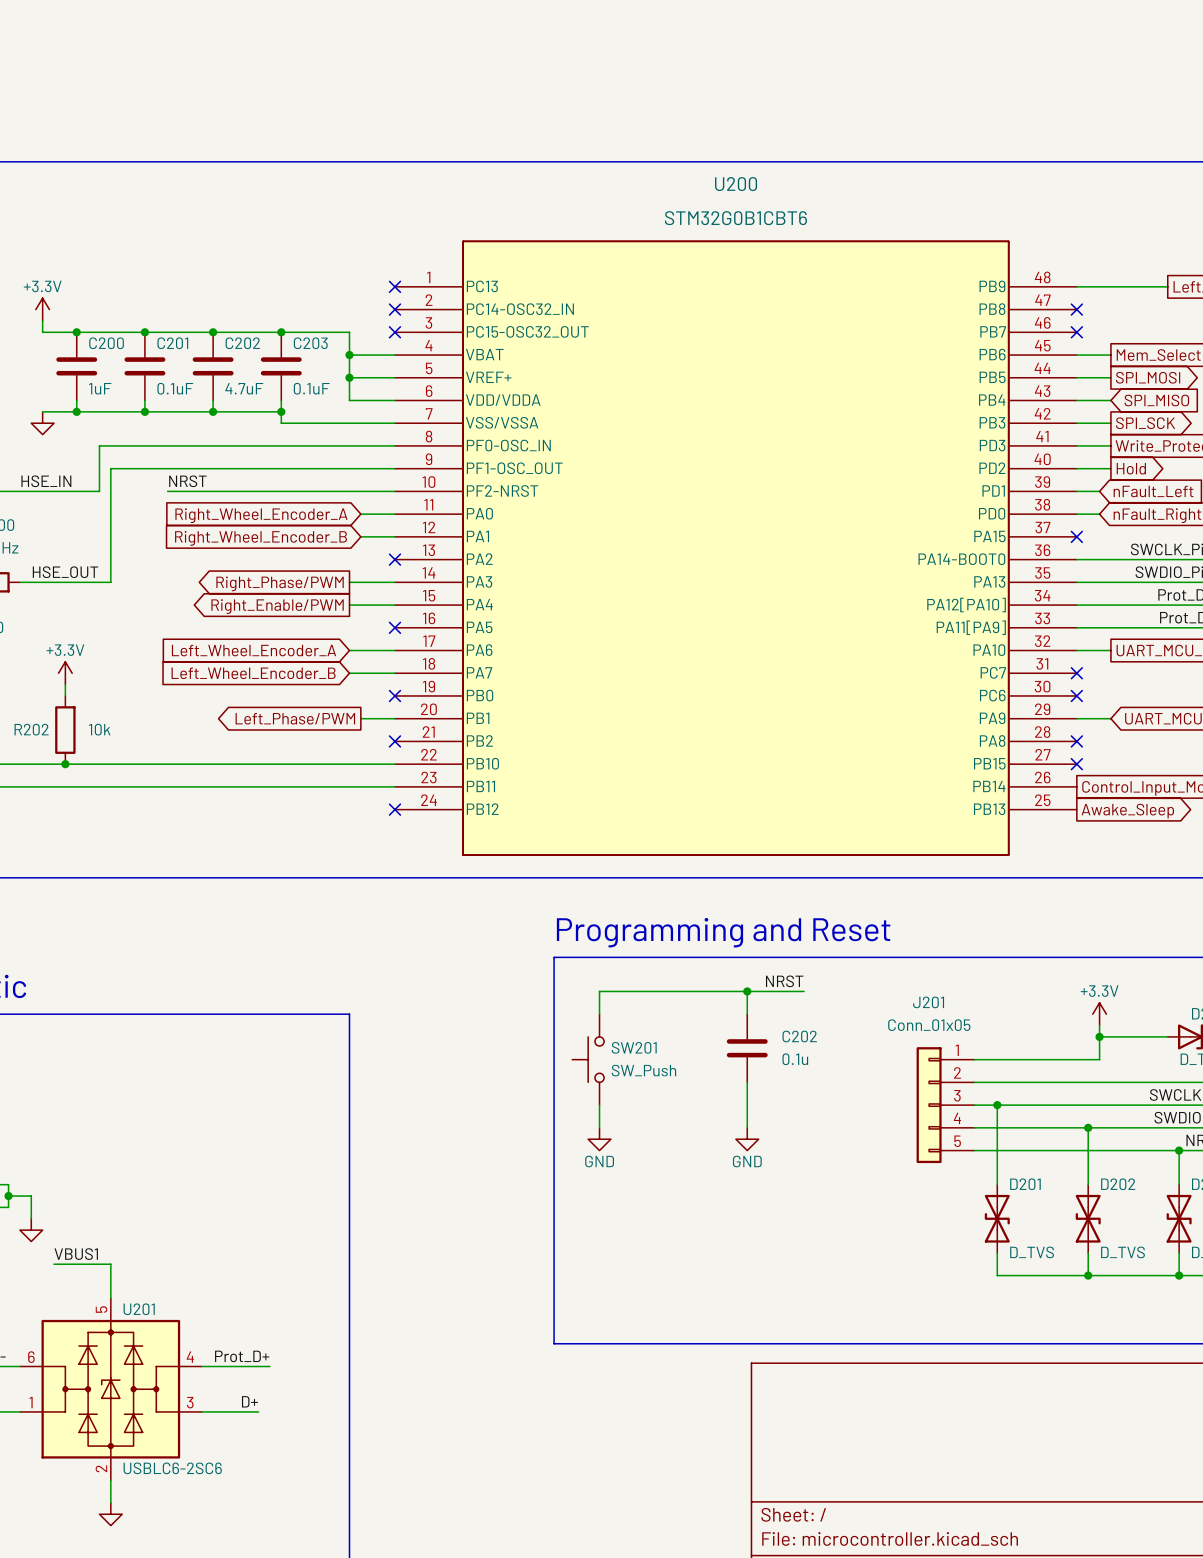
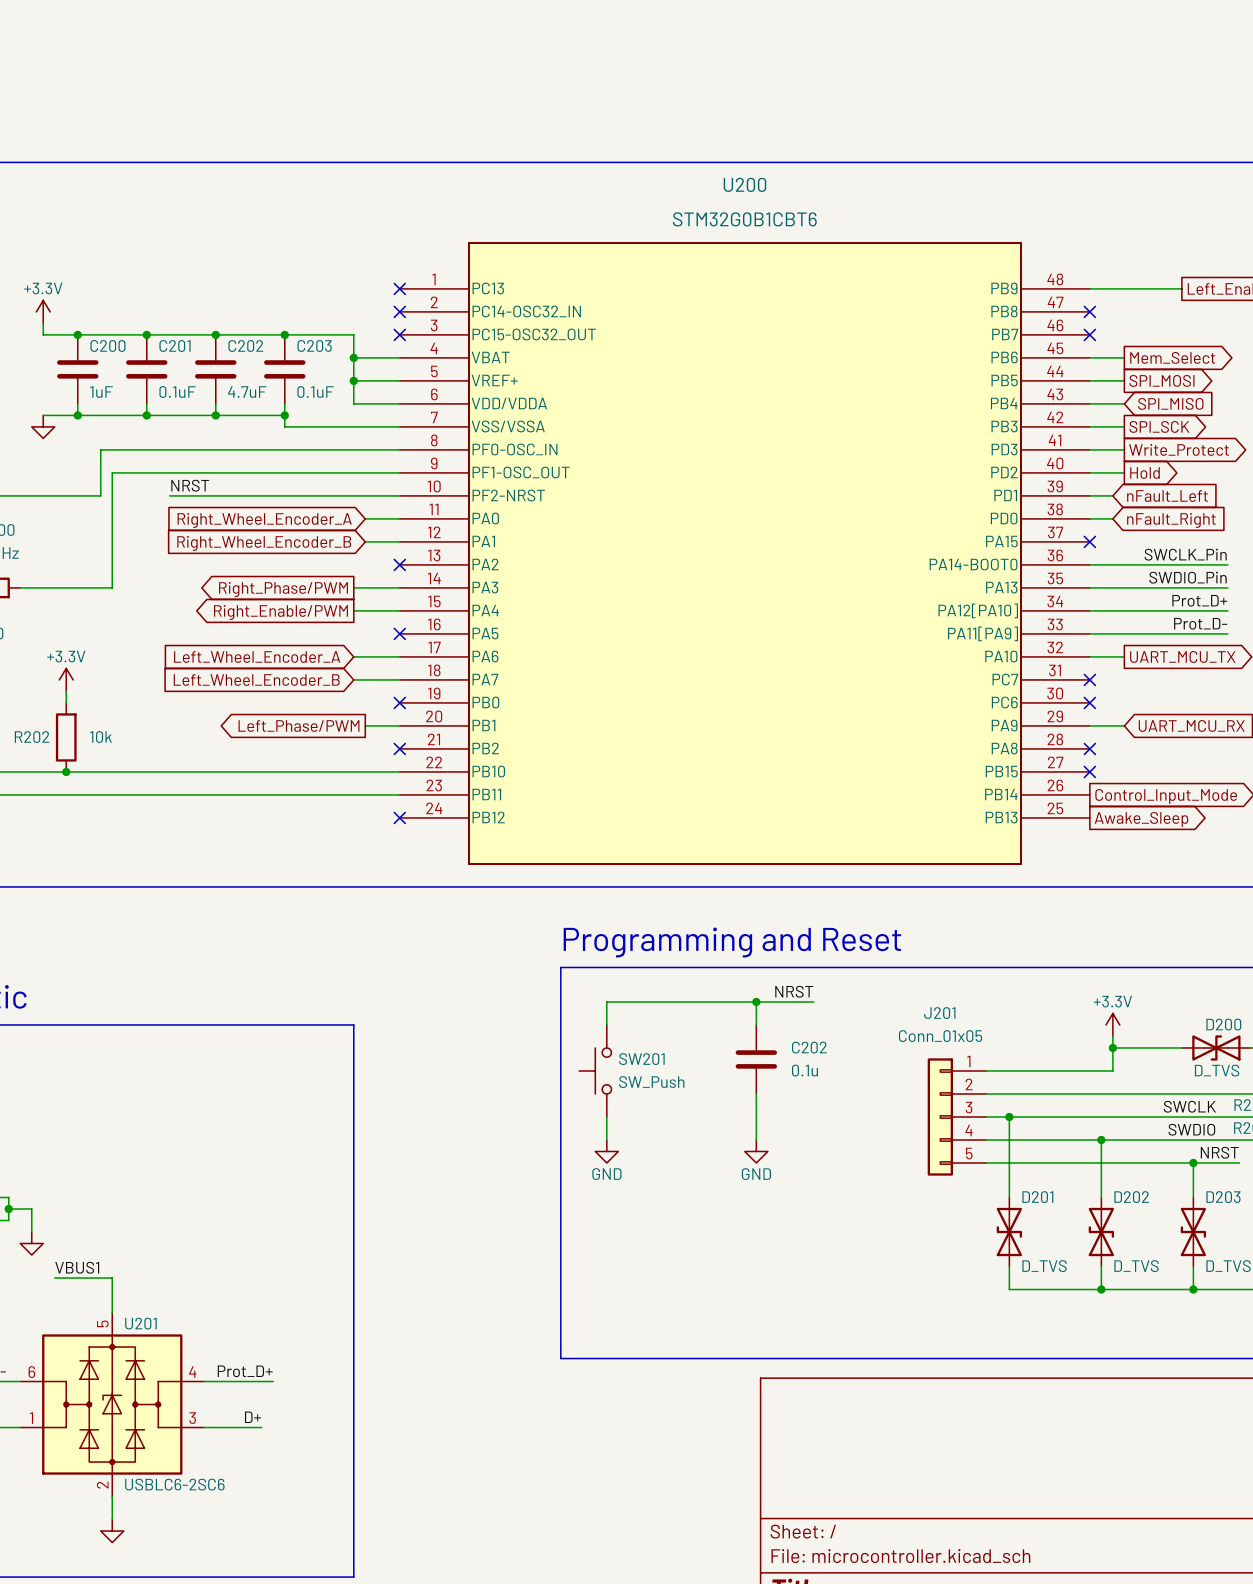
label: HSE_IN (46, 481) -> none
label: HSE_OUT (65, 572) -> none

